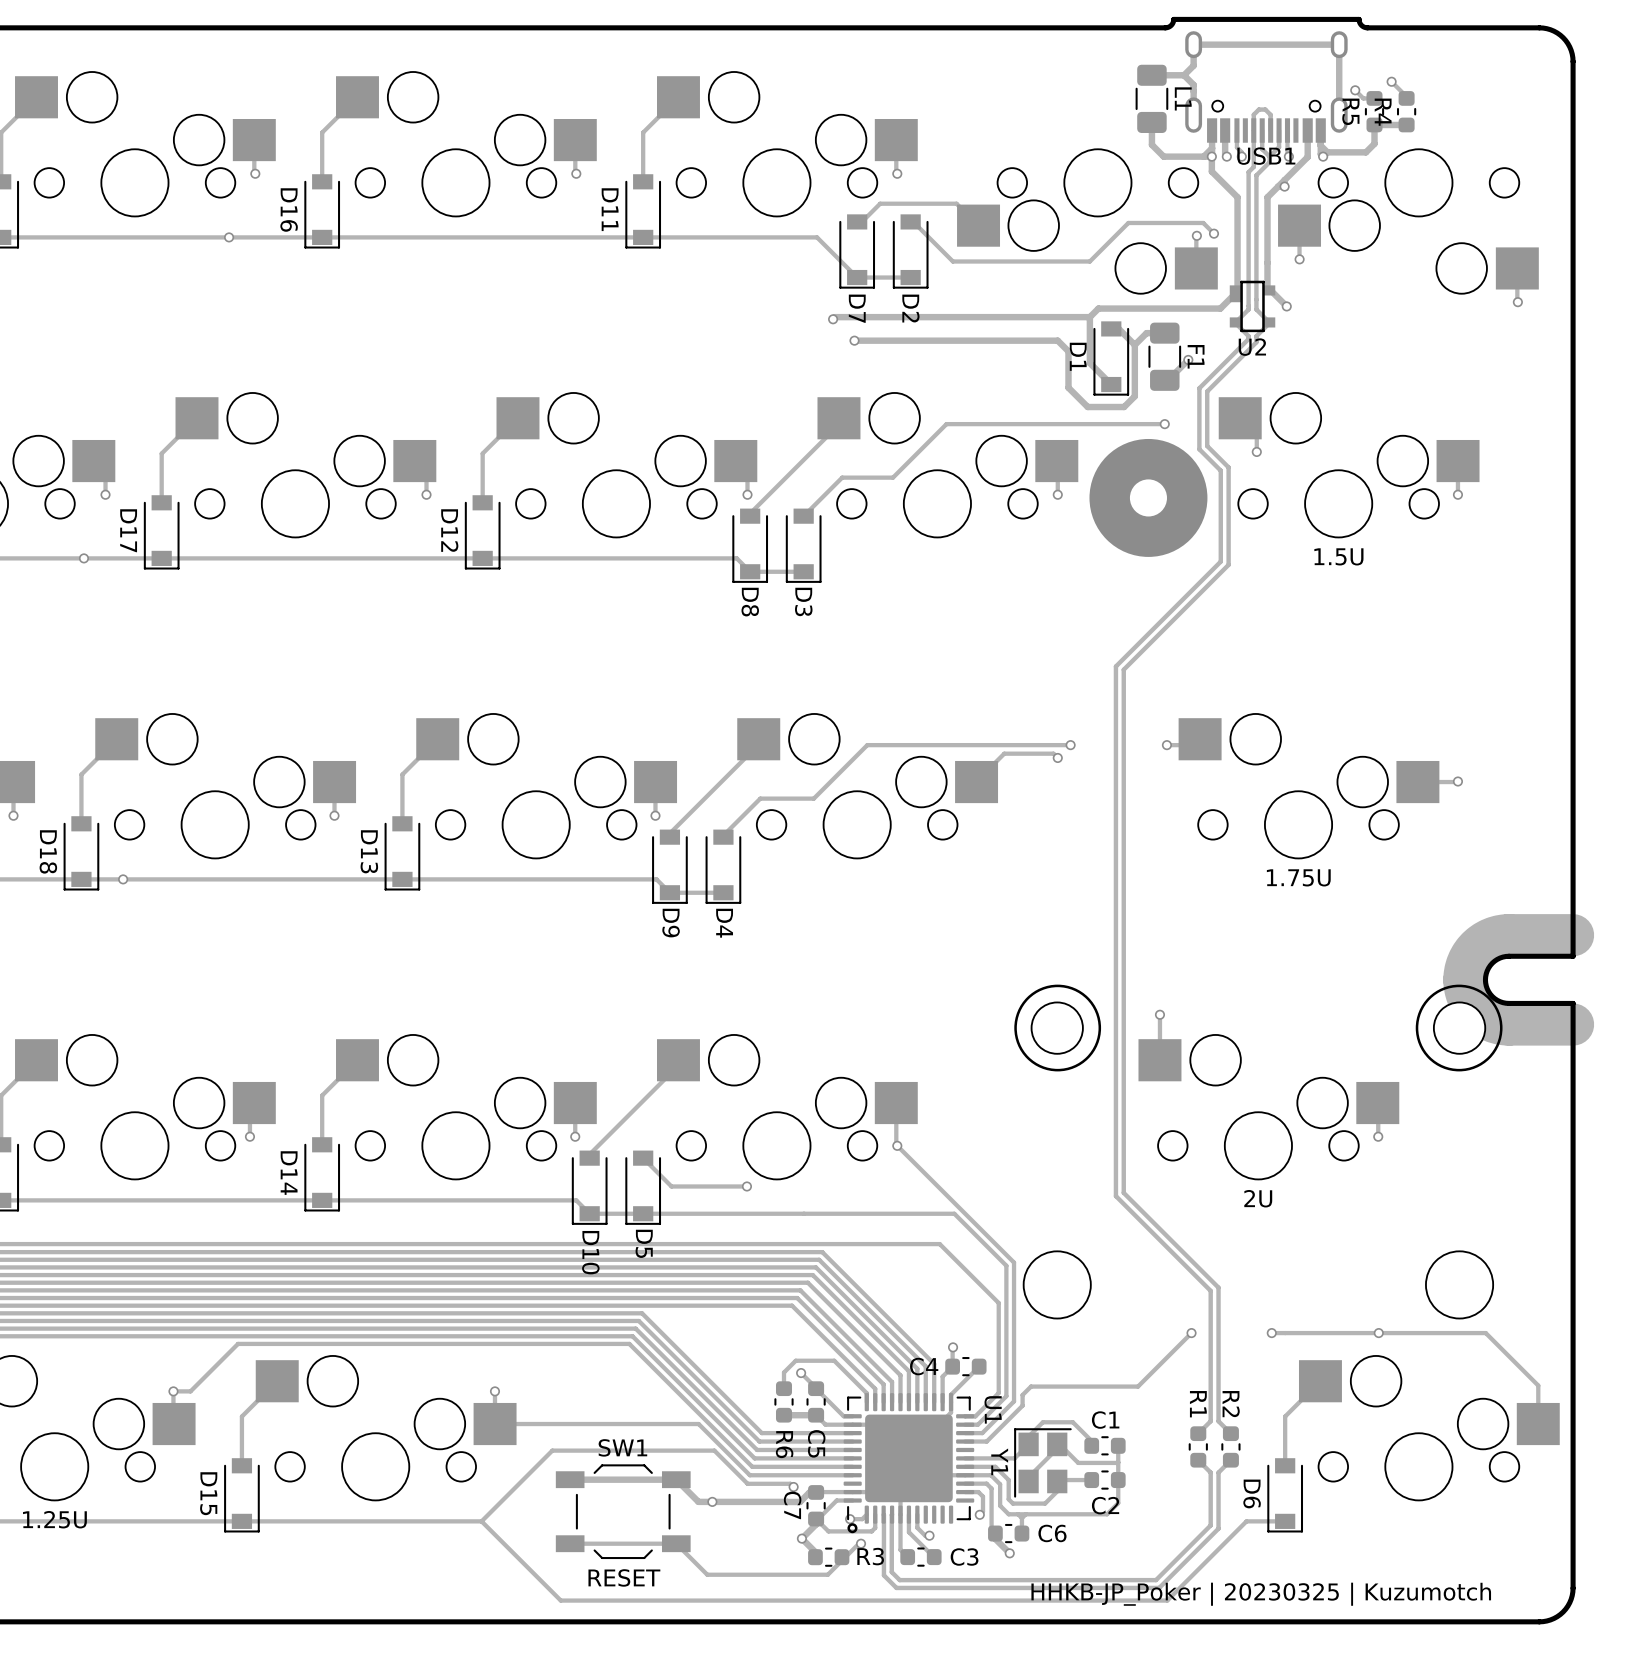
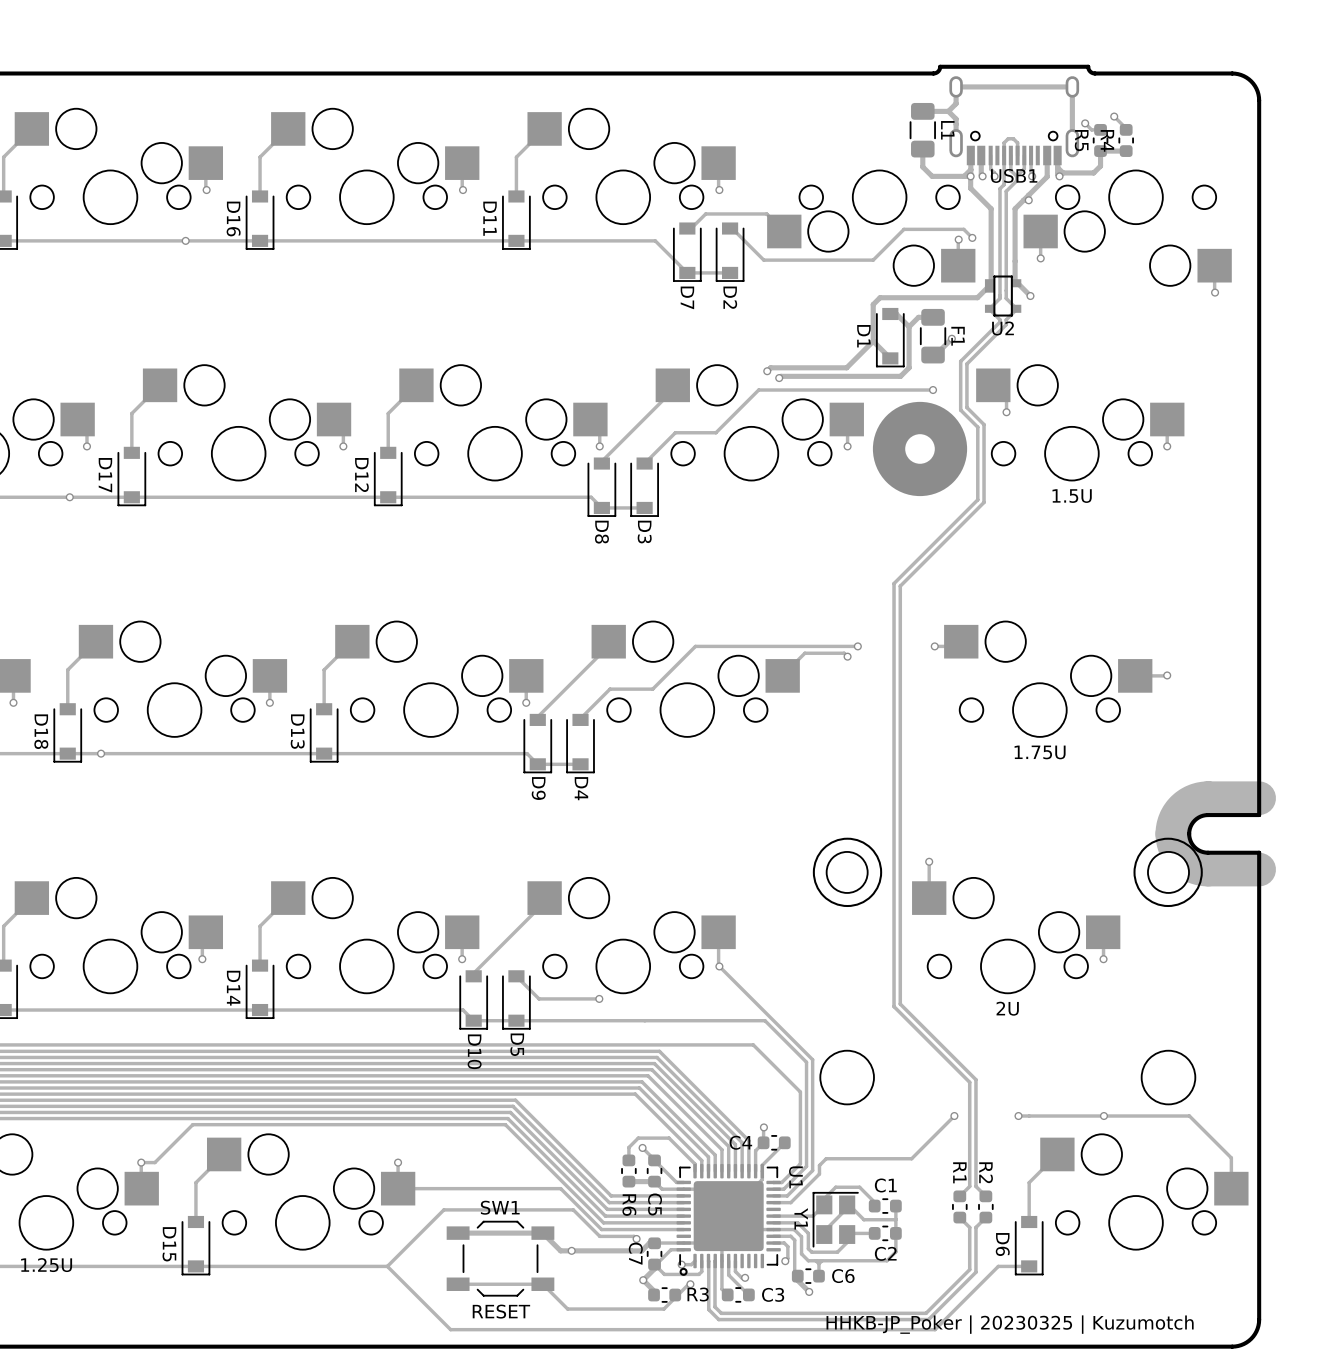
track: (1089, 317) (835, 317) (833, 319) -> none
via: (833, 319) -> none
track: (854, 340) (1057, 340) (1068, 351) (1068, 387) (1087, 407) -> (779, 378) (780, 376) (871, 376)
via: (854, 340) -> none
track: none -> (873, 341) (846, 367) (770, 367) (767, 371)
via: none -> (767, 371)
via: none -> (779, 378)

